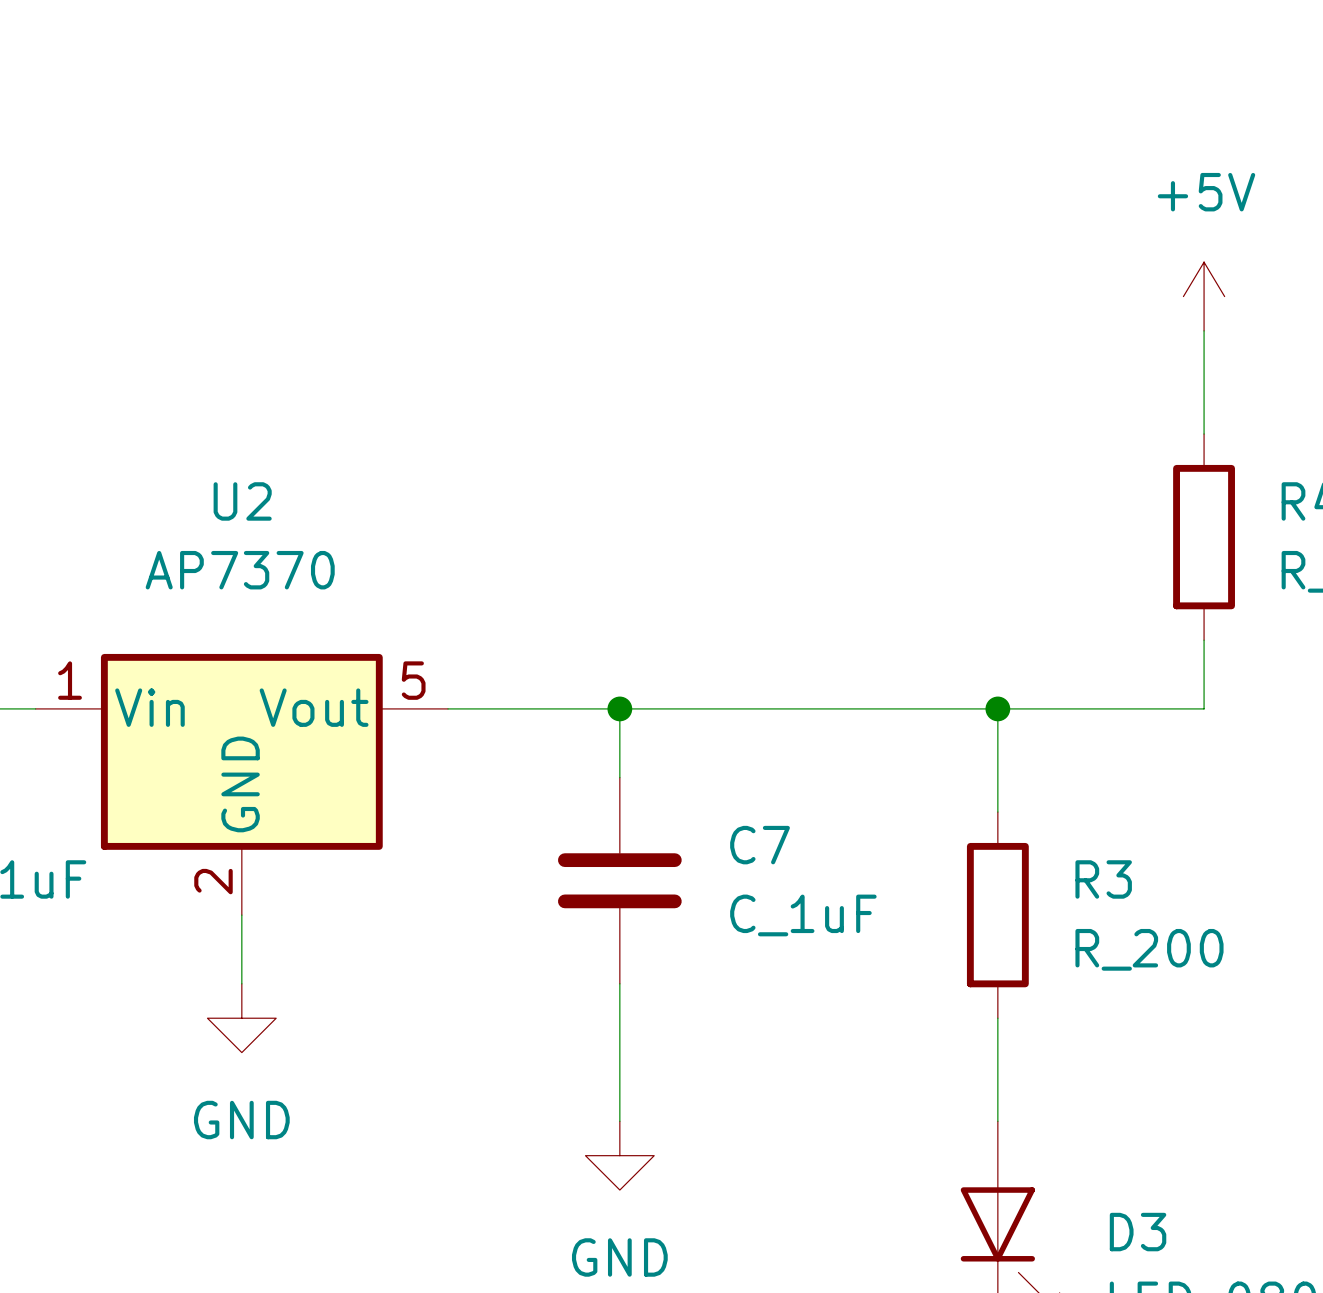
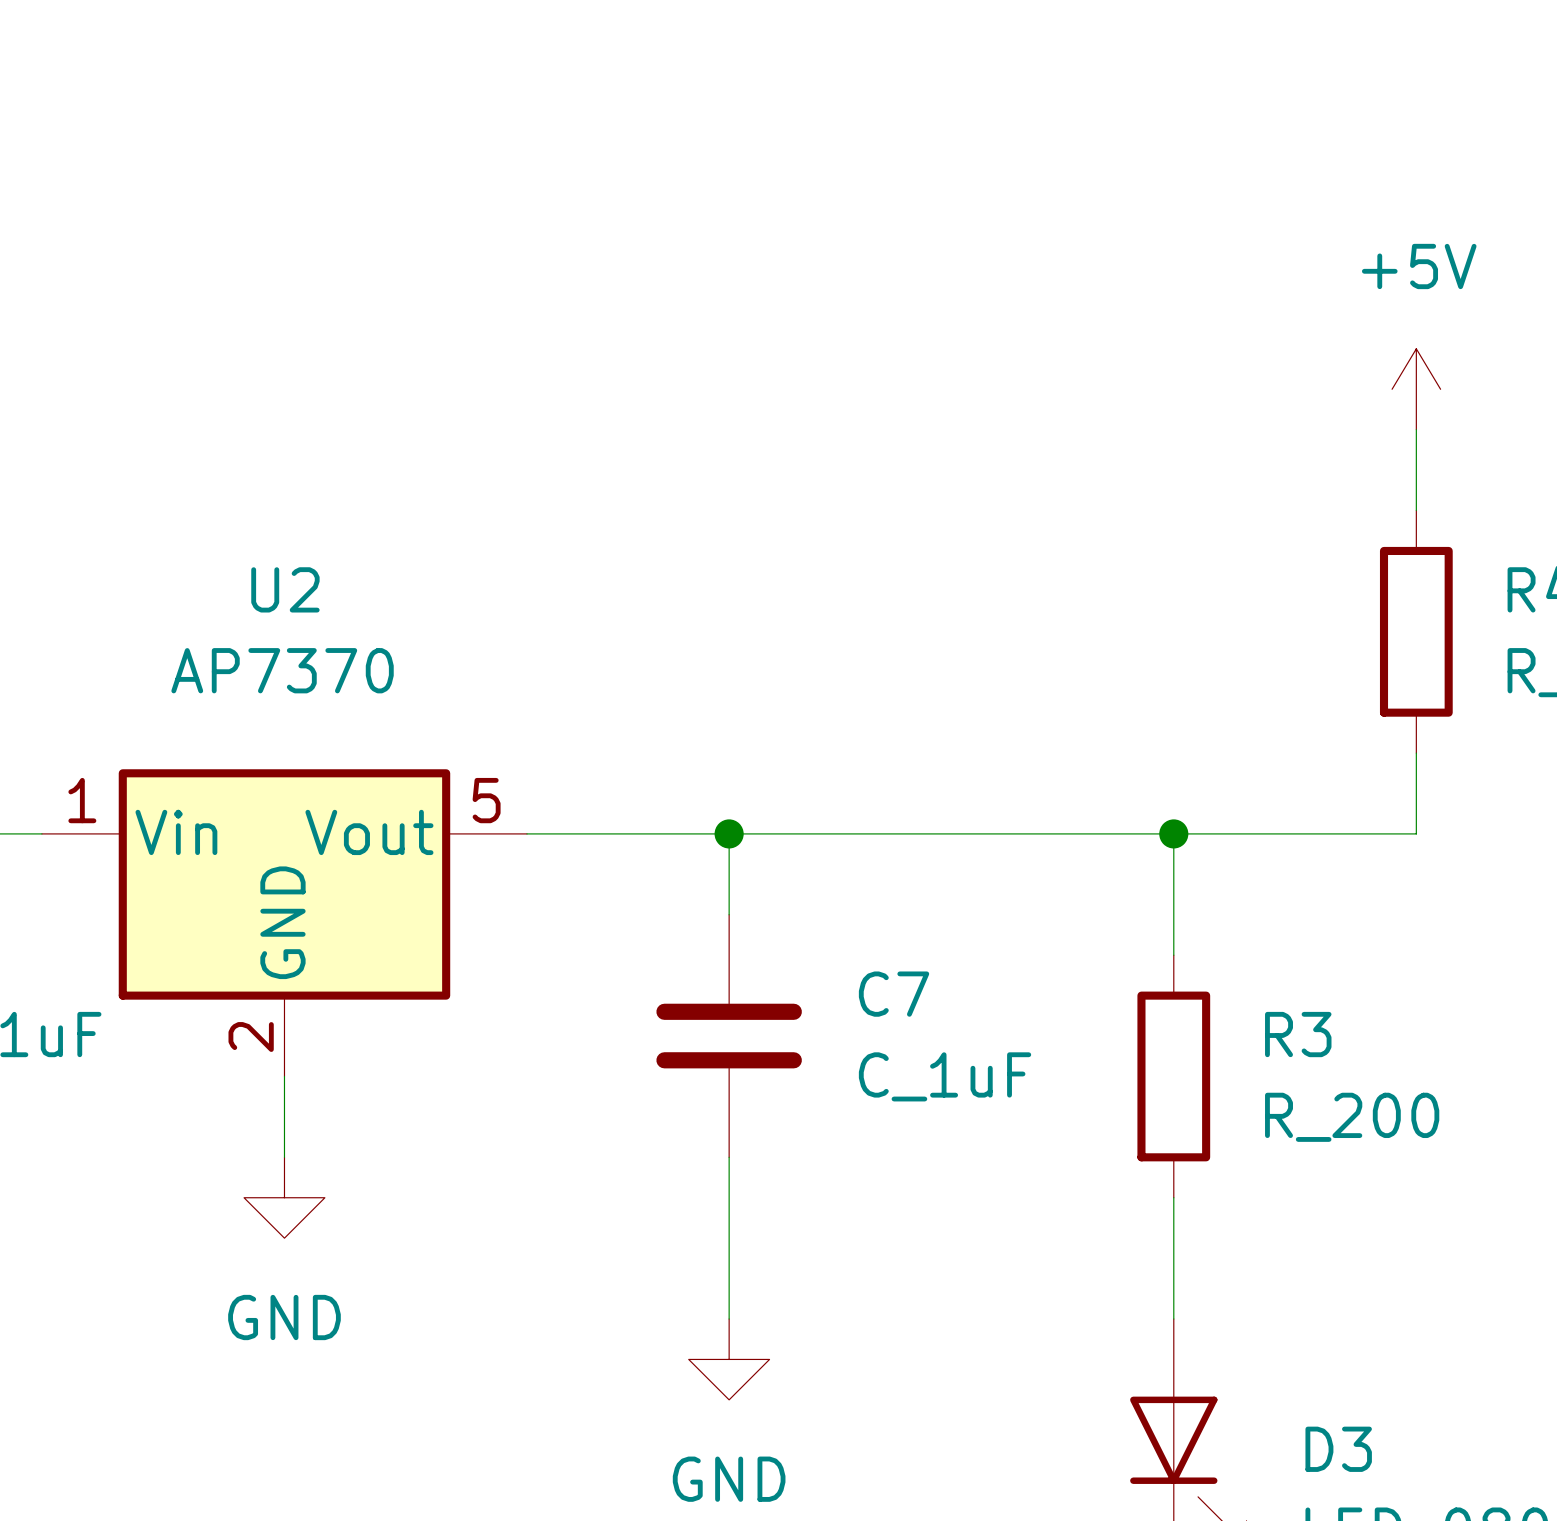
power symbol position: +5V (1204, 296) -> +5V (1416, 389)

